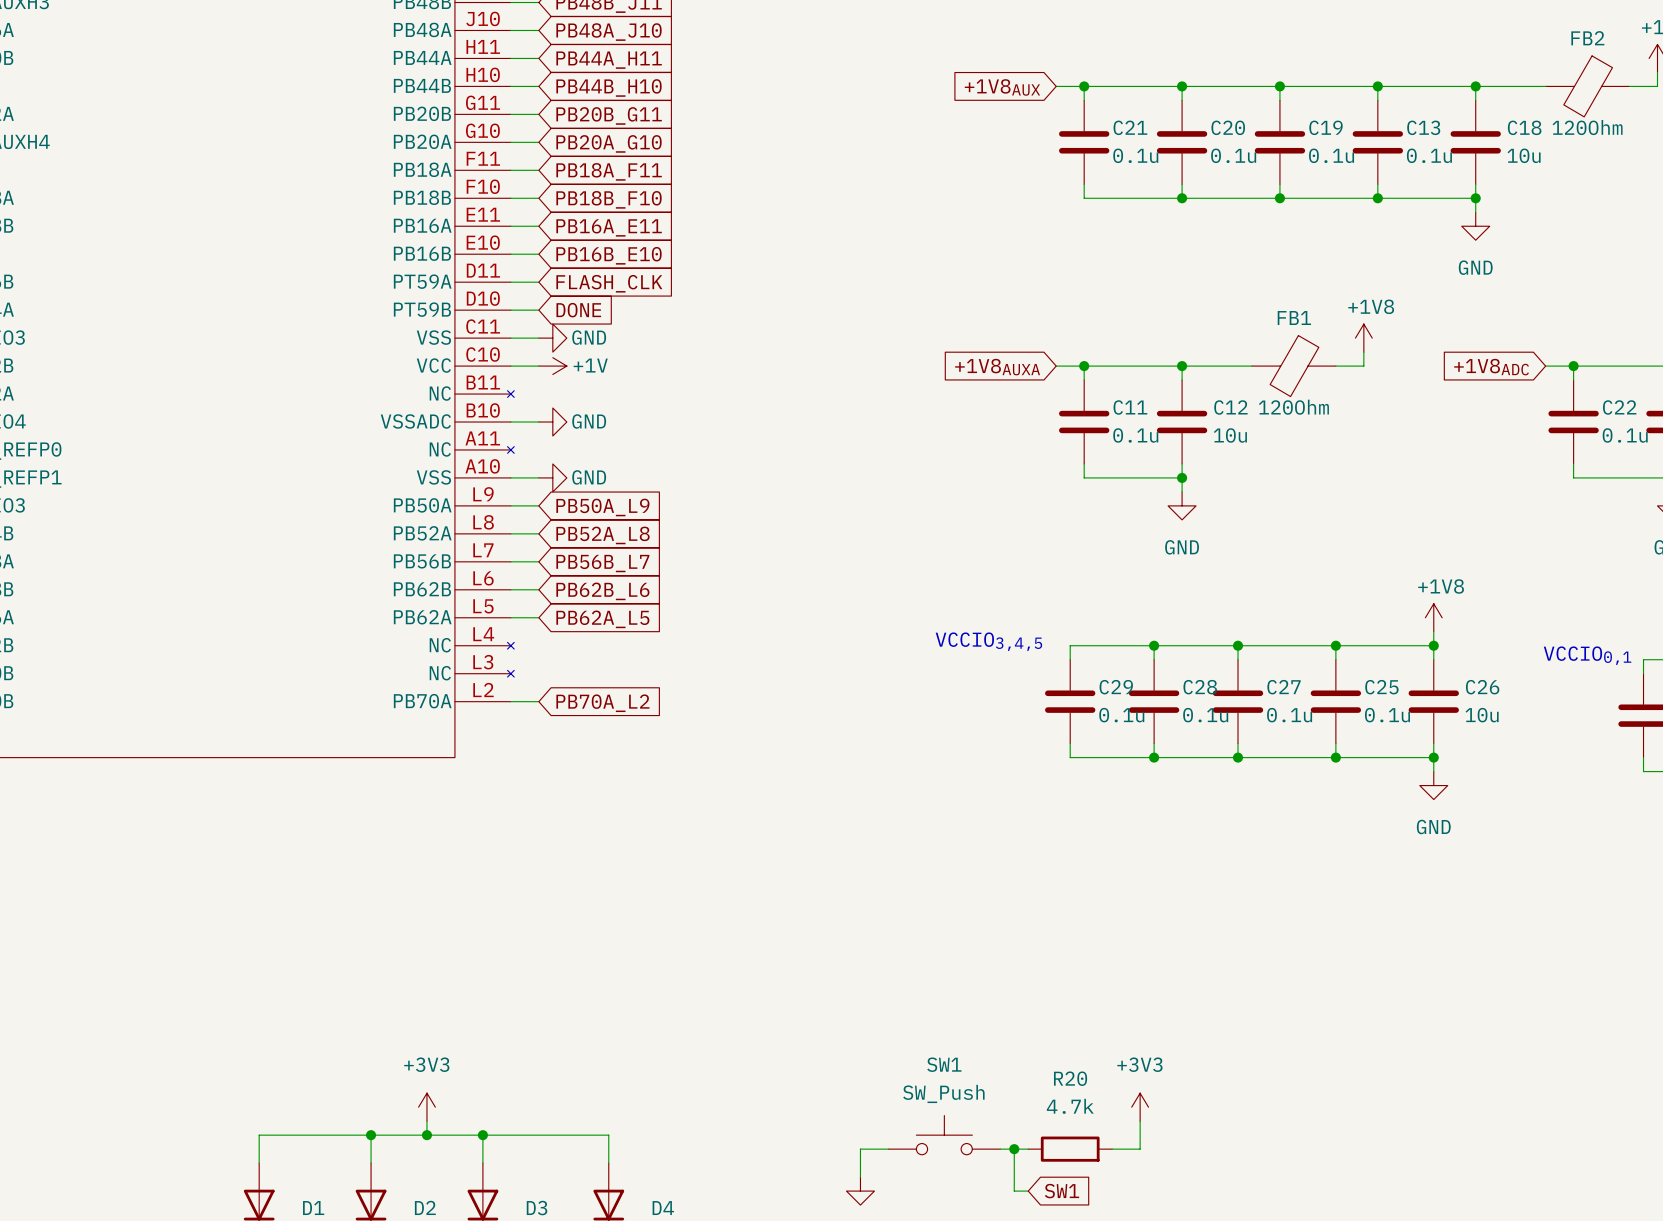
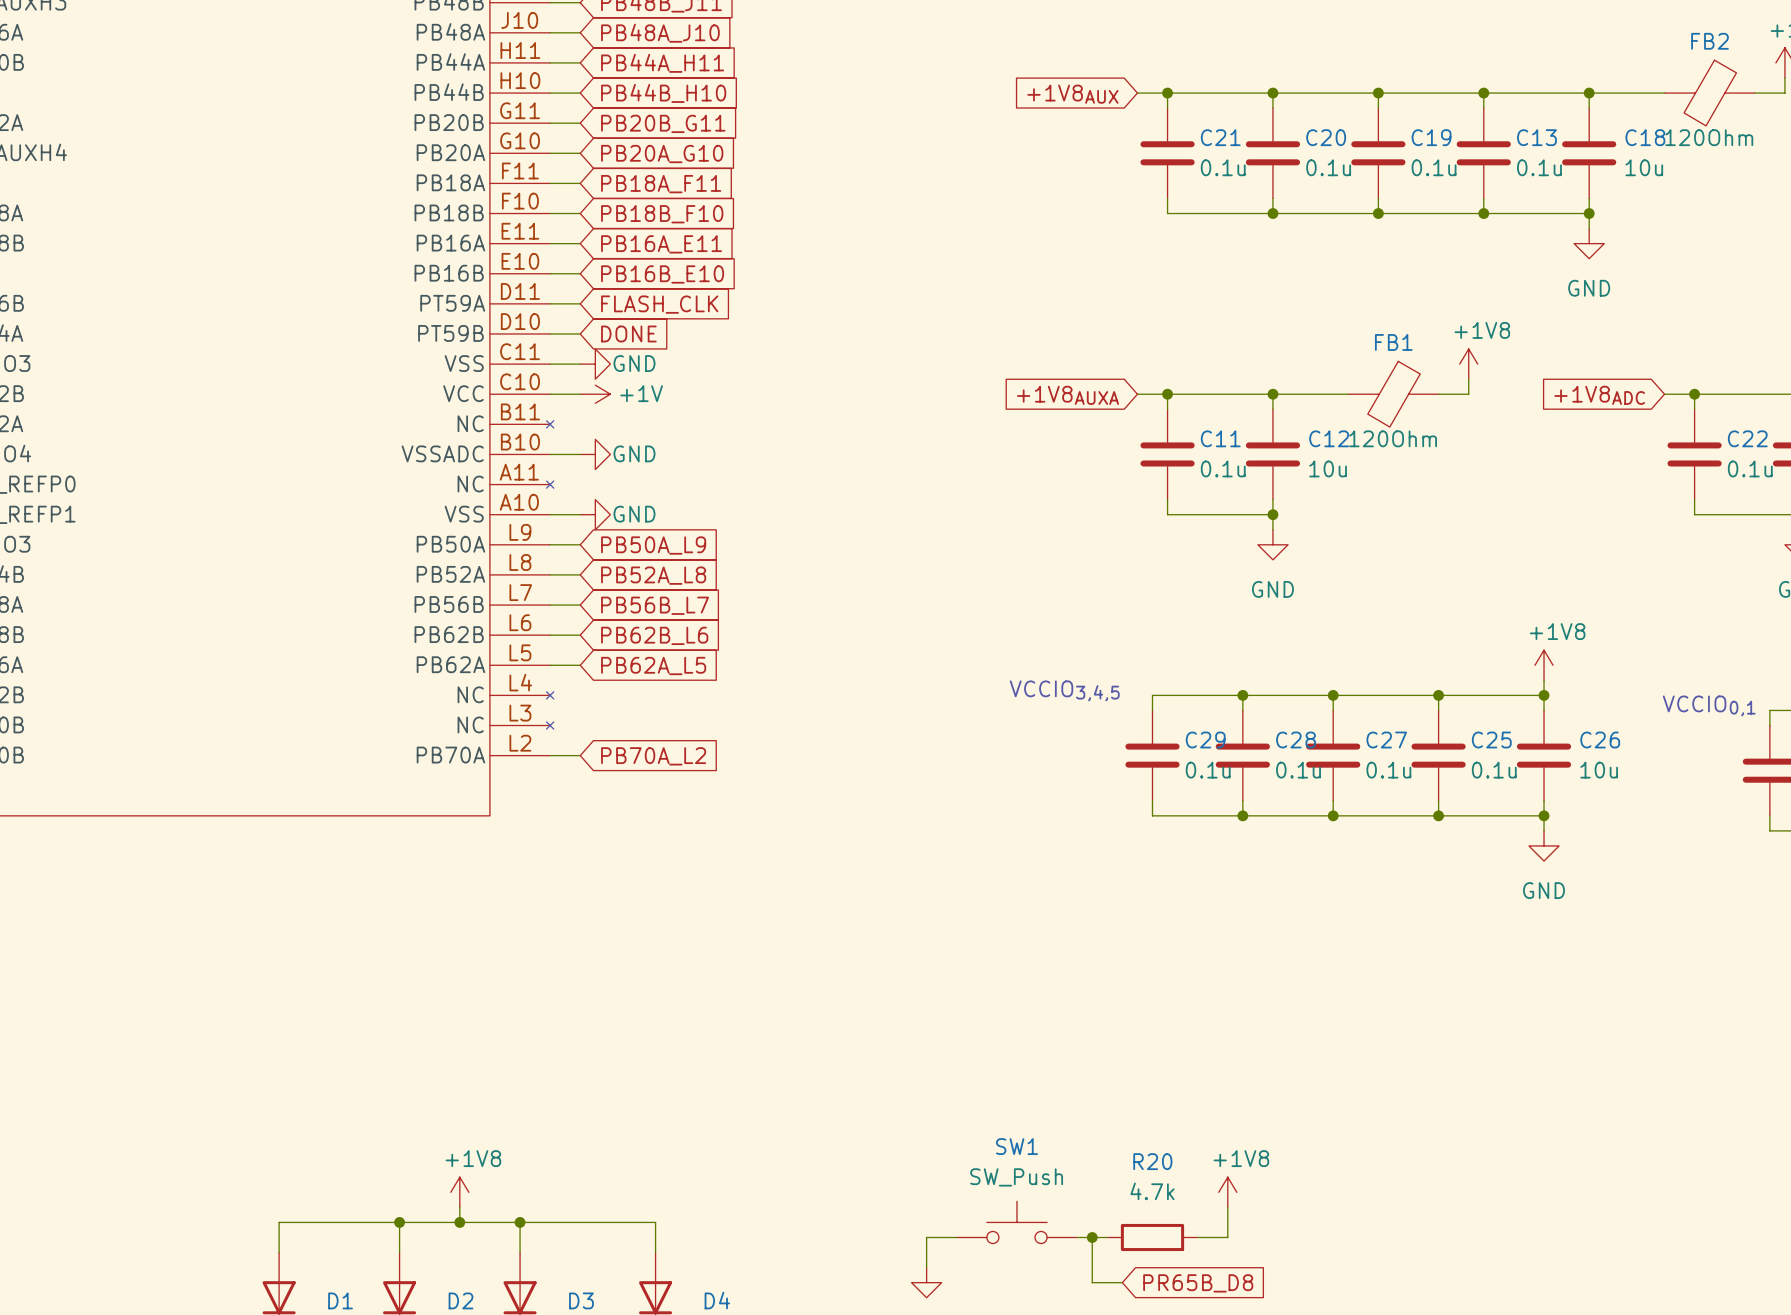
power symbol: +3V3 (426, 1107) -> +1V8 (459, 1192)
power symbol: +3V3 (1140, 1107) -> +1V8 (1227, 1192)
wire: none -> (1107, 1282) (1122, 1282)
global label: SW1 (1062, 1191) -> none
global label: none -> PR65B_D8 (1198, 1283)

